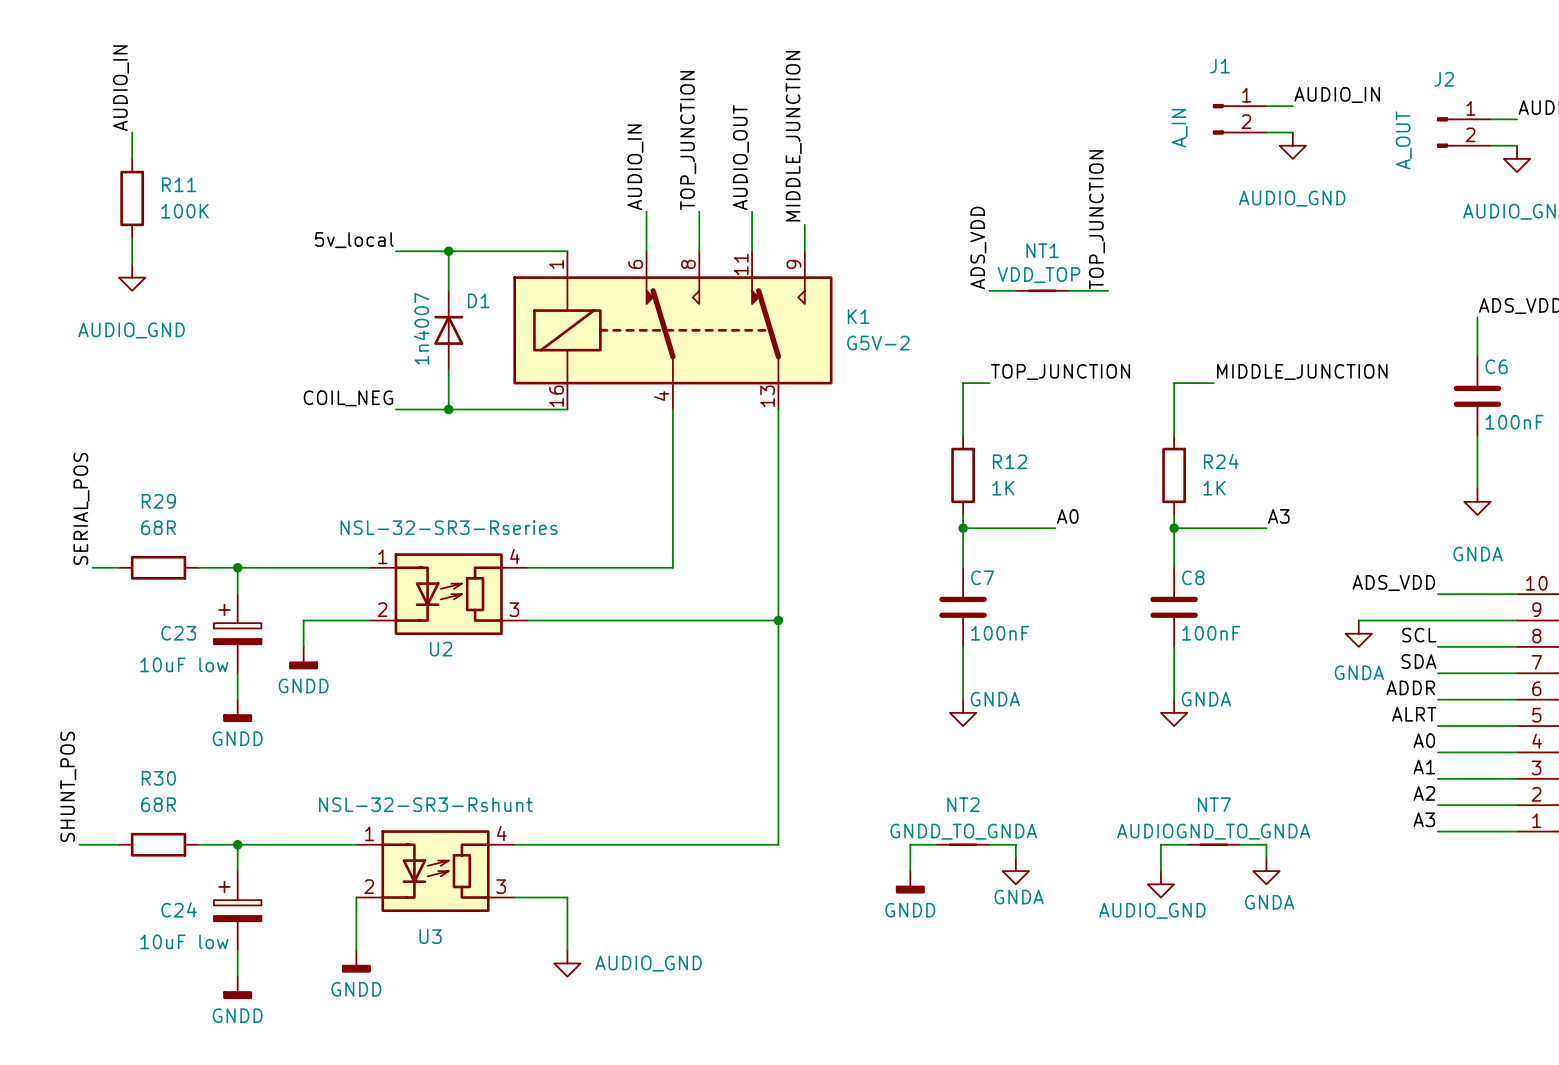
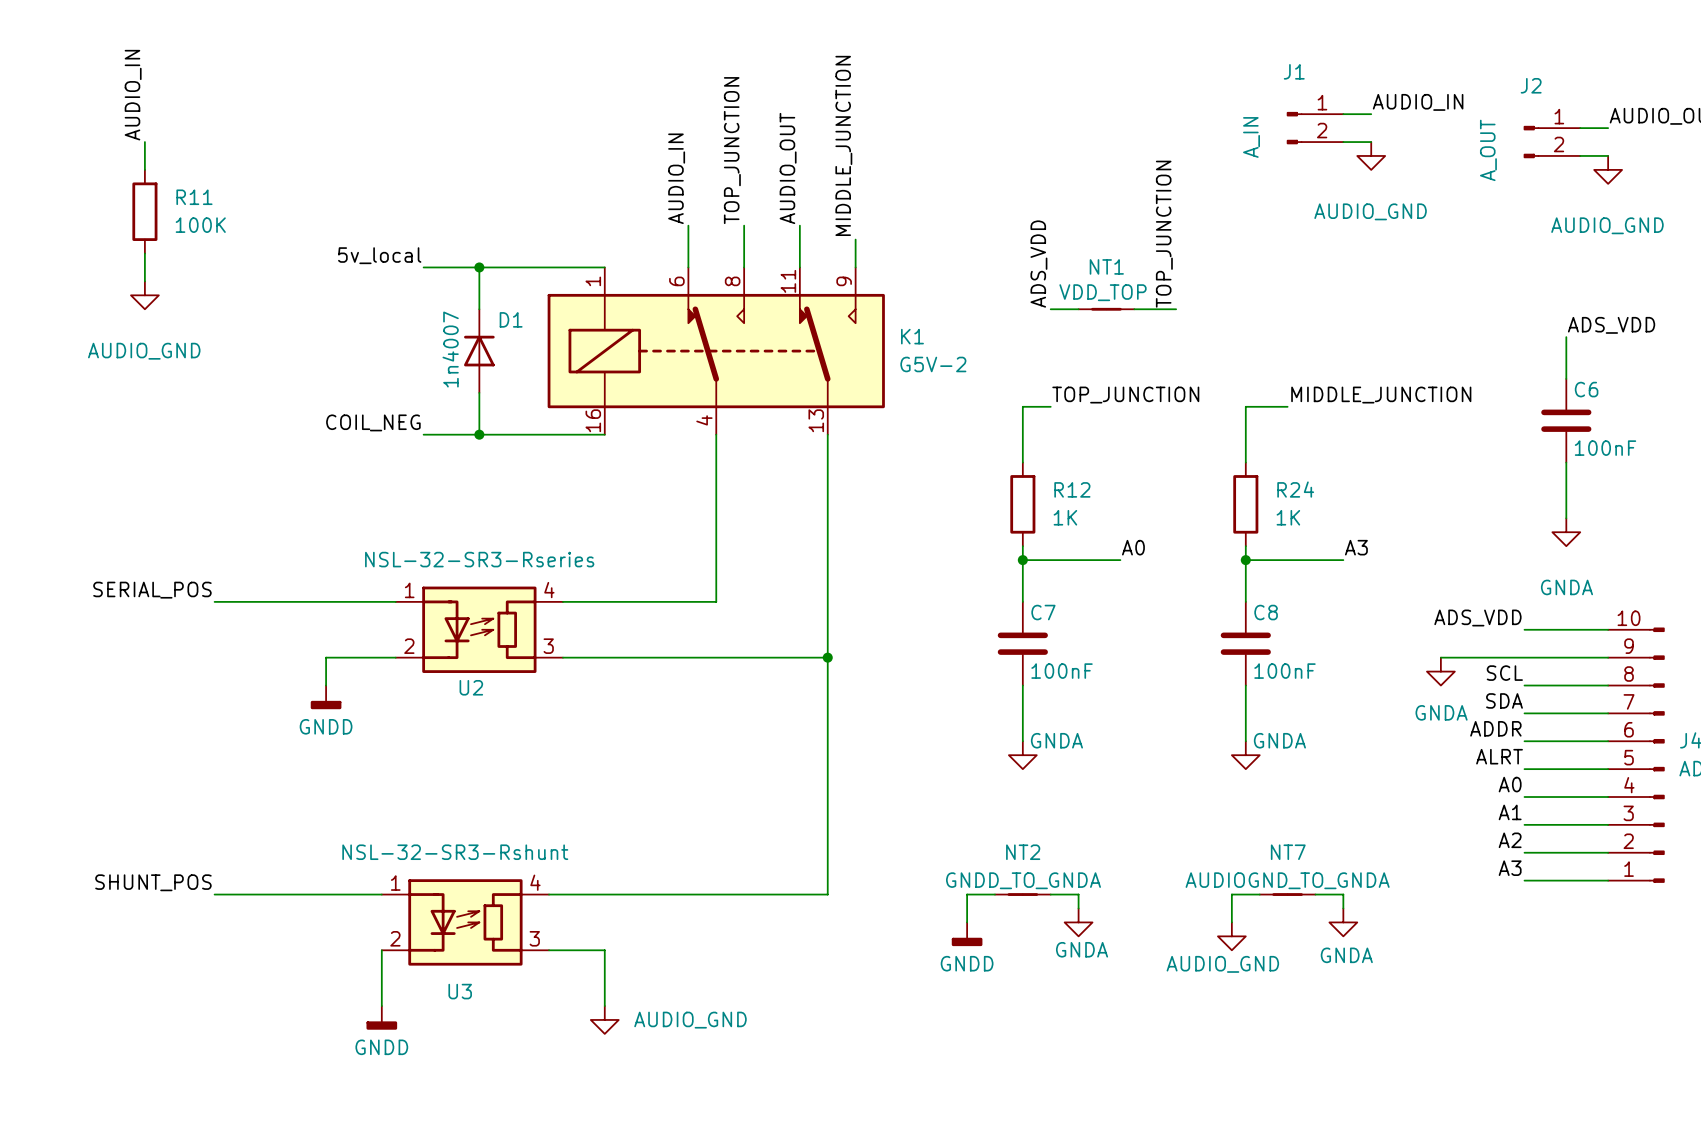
label rotation: 0° (81, 508) -> 90° clockwise (152, 590)
wire: (92, 567) (118, 567) -> none
R29: 68R (158, 567) -> none
wire: (237, 567) (237, 594) -> none
junction: (237, 567) -> none
C23: 10uF low (237, 633) -> none
wire: (237, 673) (237, 699) -> none
power symbol: GNDD (237, 710) -> none
label rotation: 0° (68, 786) -> 90° clockwise (153, 882)
wire: (79, 844) (118, 844) -> none
R30: 68R (158, 844) -> none
wire: (237, 844) (237, 871) -> none
junction: (237, 844) -> none
C24: 10uF low (237, 910) -> none
wire: (237, 950) (237, 976) -> none
power symbol: GNDD (237, 987) -> none

